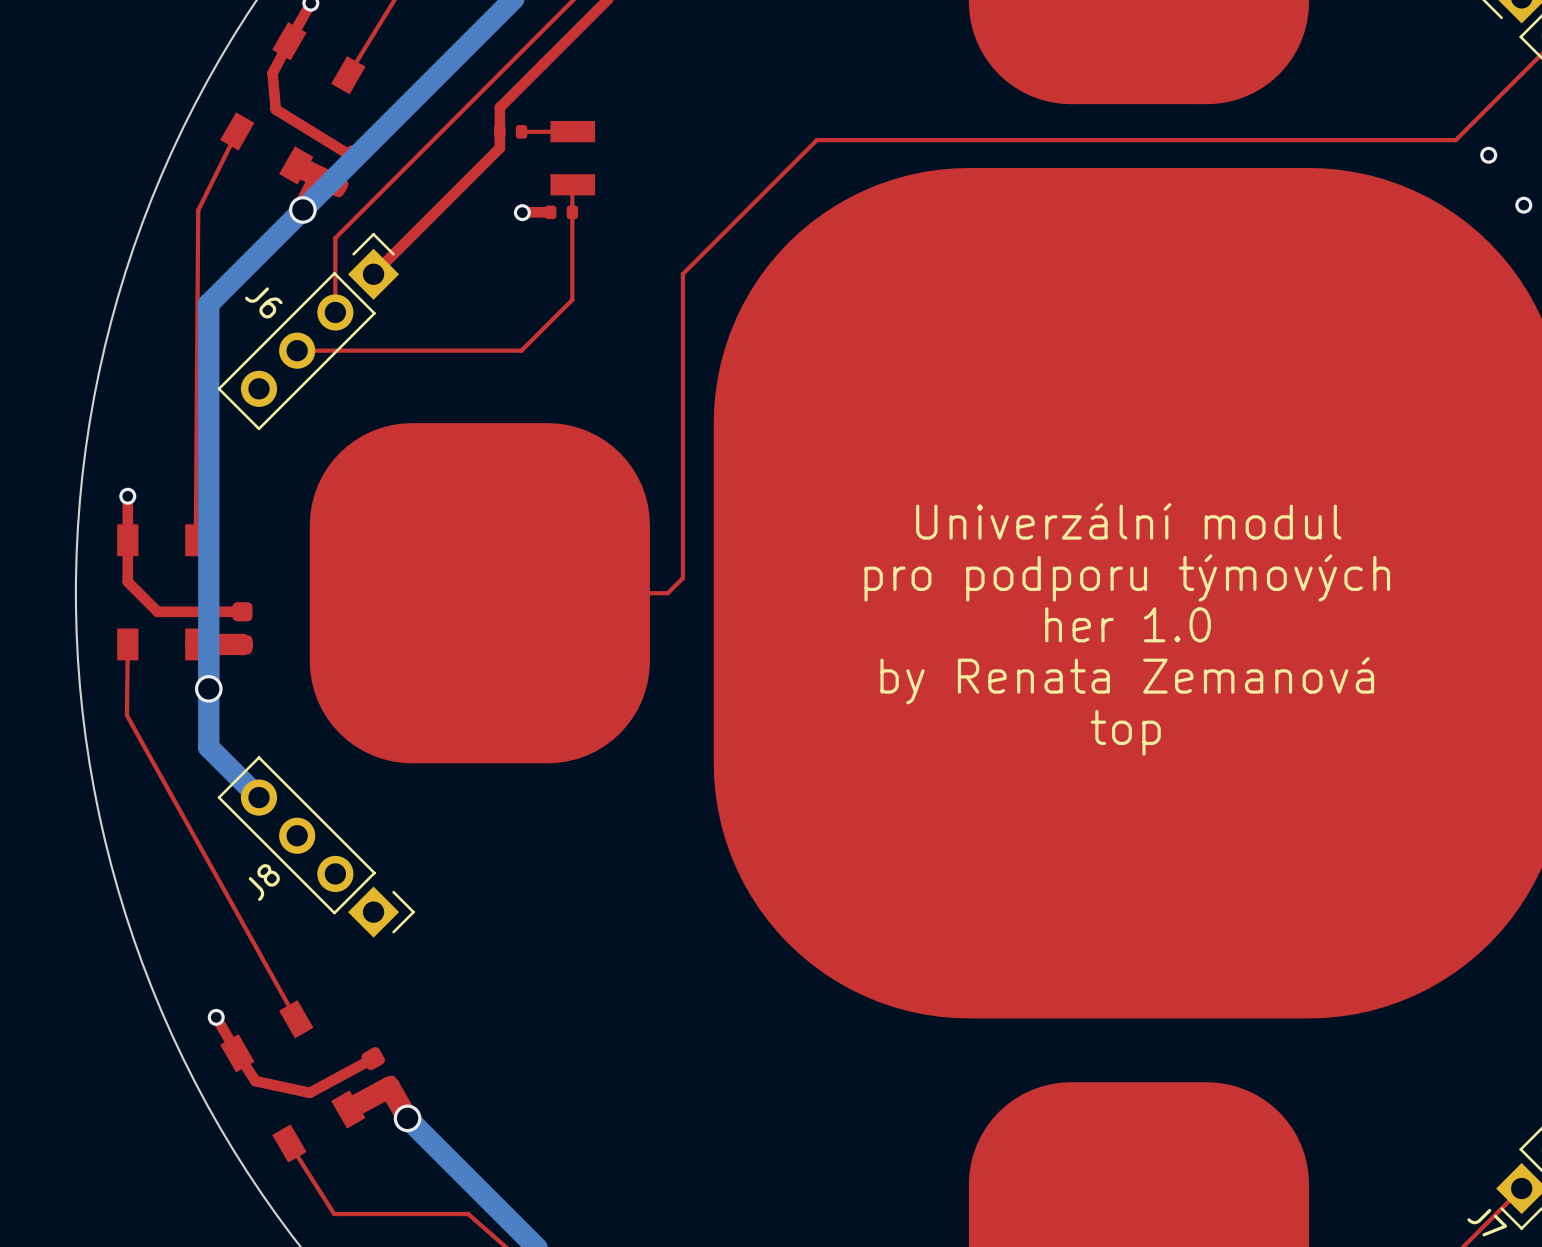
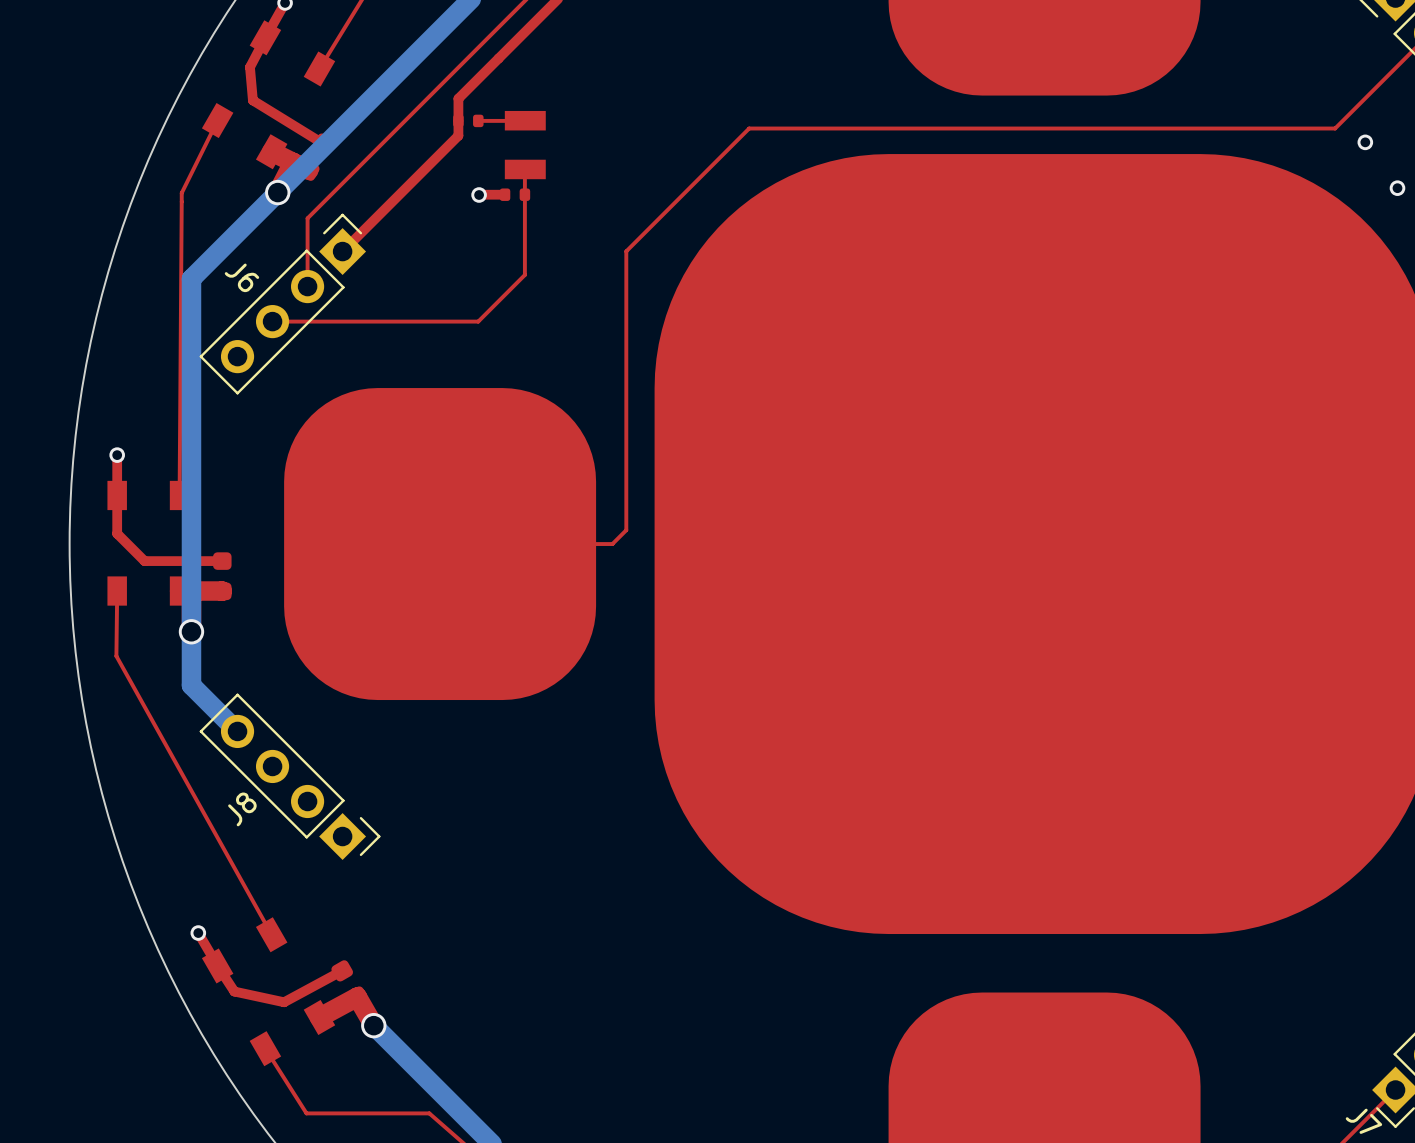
text: Univerzální modul (1128, 521) -> none
text: pro podporu týmových (1127, 578) -> none
text: her 1.0 (1128, 624) -> none
text: by Renata Zemanová (1127, 680) -> none
text: top (1125, 732) -> none

